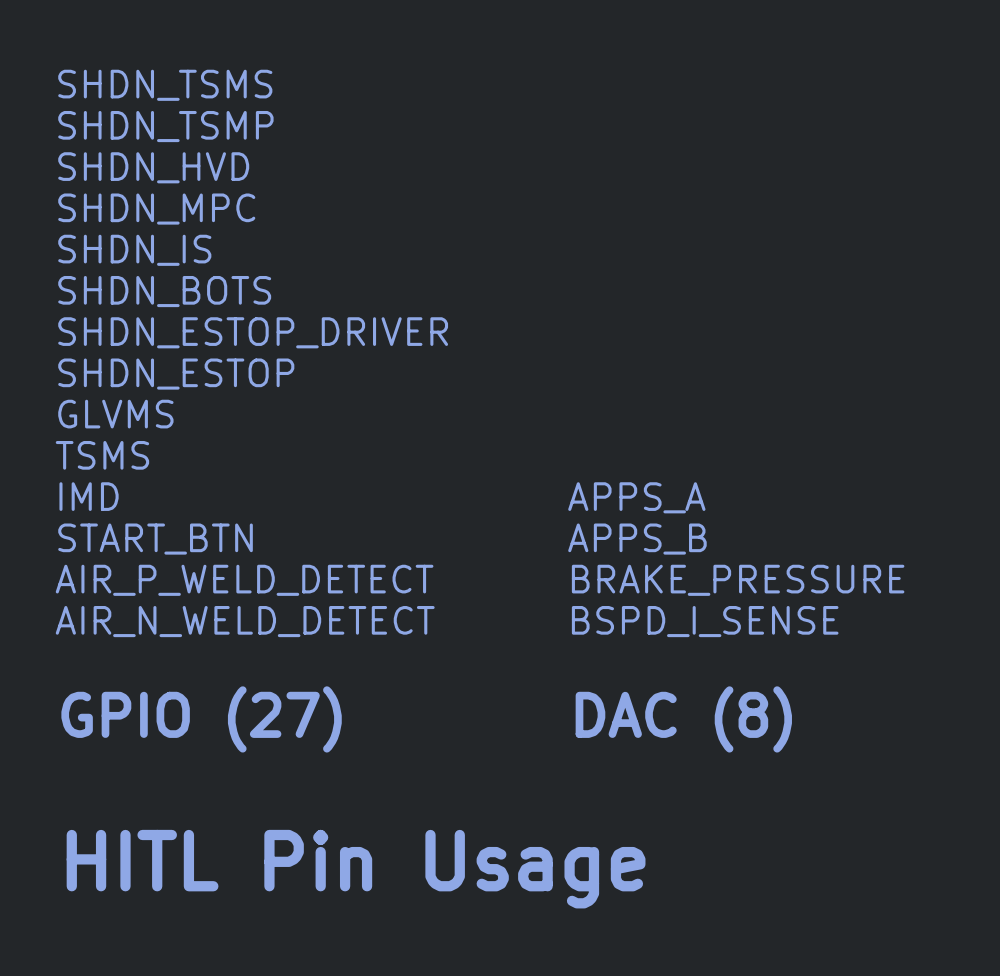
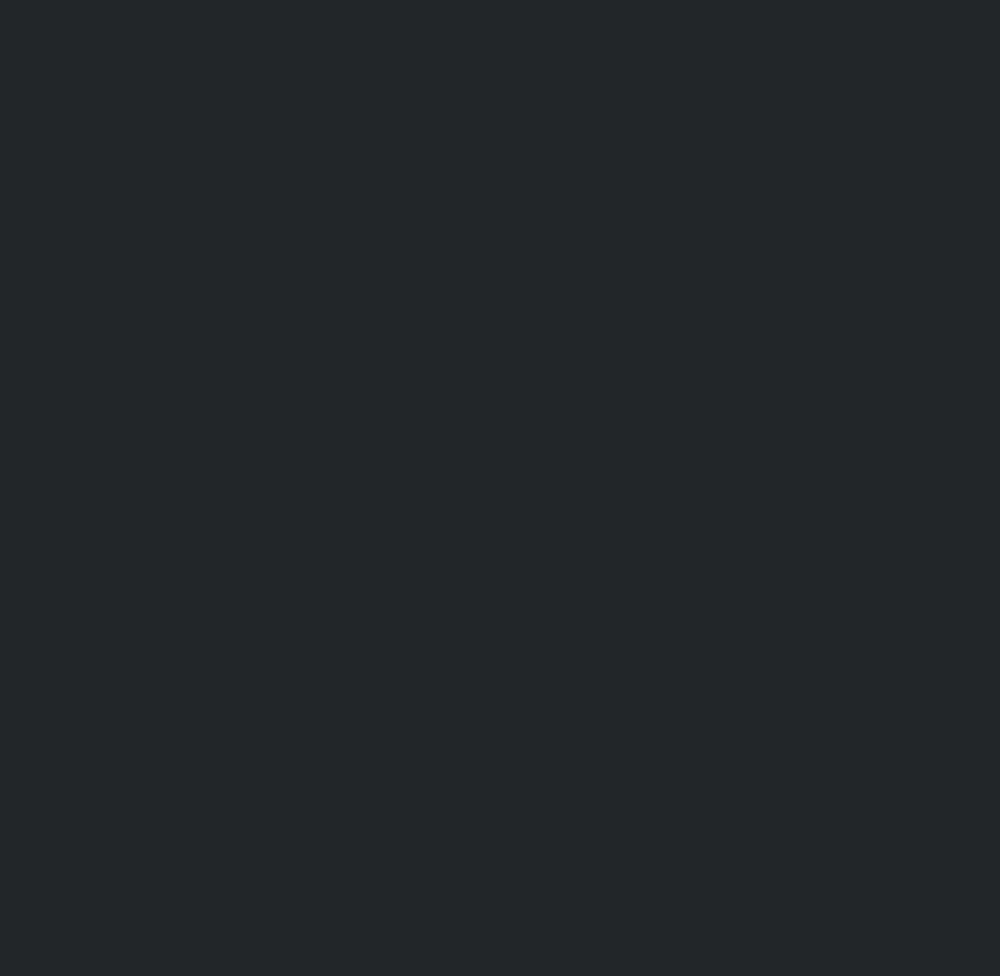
text: SHDN_TSMS (165, 85) -> none
text: SHDN_TSMP (165, 126) -> none
text: SHDN_HVD (153, 167) -> none
text: SHDN_MPC (156, 209) -> none
text: SHDN_IS (134, 250) -> none
text: SHDN_BOTS (164, 291) -> none
text: SHDN_ESTOP_DRIVER (253, 332) -> none
text: SHDN_ESTOP (176, 374) -> none
text: GLVMS (115, 414) -> none
text: TSMS (102, 455) -> none
text: IMD (89, 496) -> none
text: APPS_A (636, 497) -> none
text: START_BTN (155, 539) -> none
text: APPS_B (637, 539) -> none
text: AIR_P_WELD_DETECT (244, 580) -> none
text: BRAKE_PRESSURE (738, 580) -> none
text: AIR_N_WELD_DETECT (245, 621) -> none
text: BSPD_I_SENSE (705, 621) -> none
text: GPIO (27) (201, 719) -> none
text: DAC (8) (683, 719) -> none
text: HITL Pin Usage (356, 869) -> none

